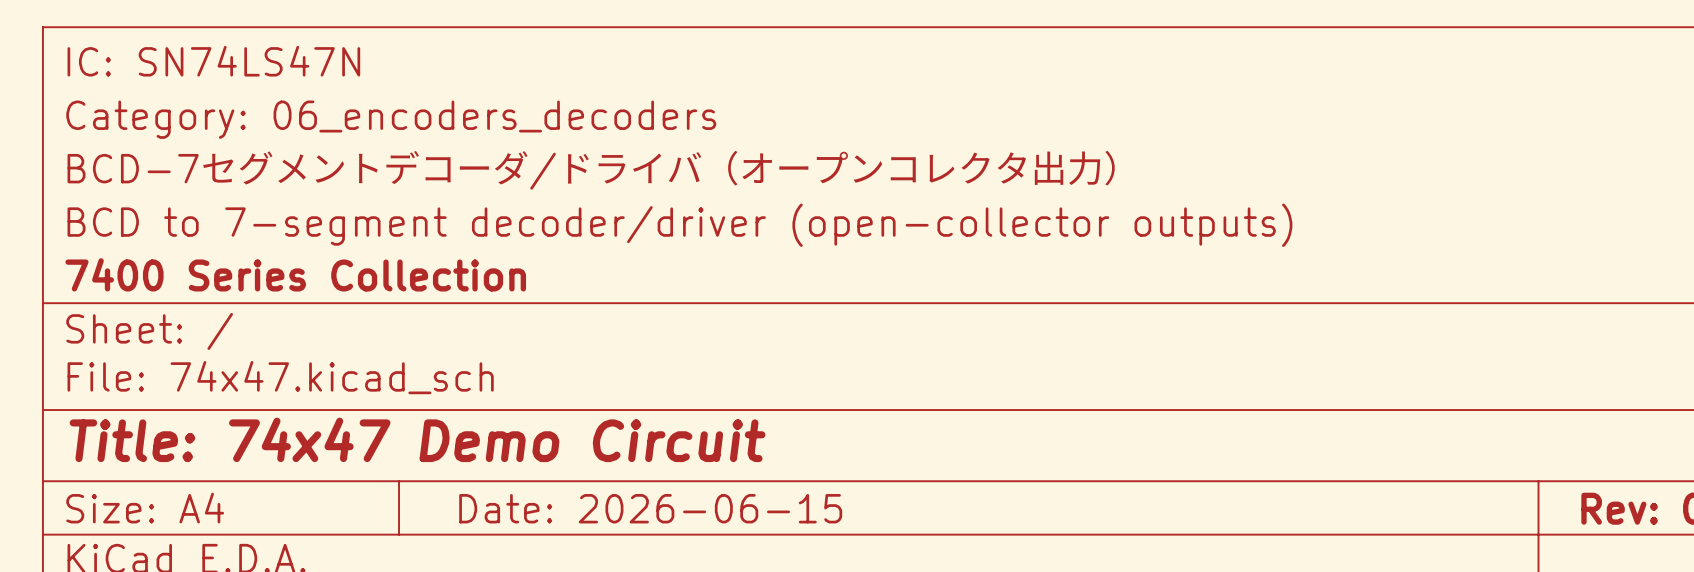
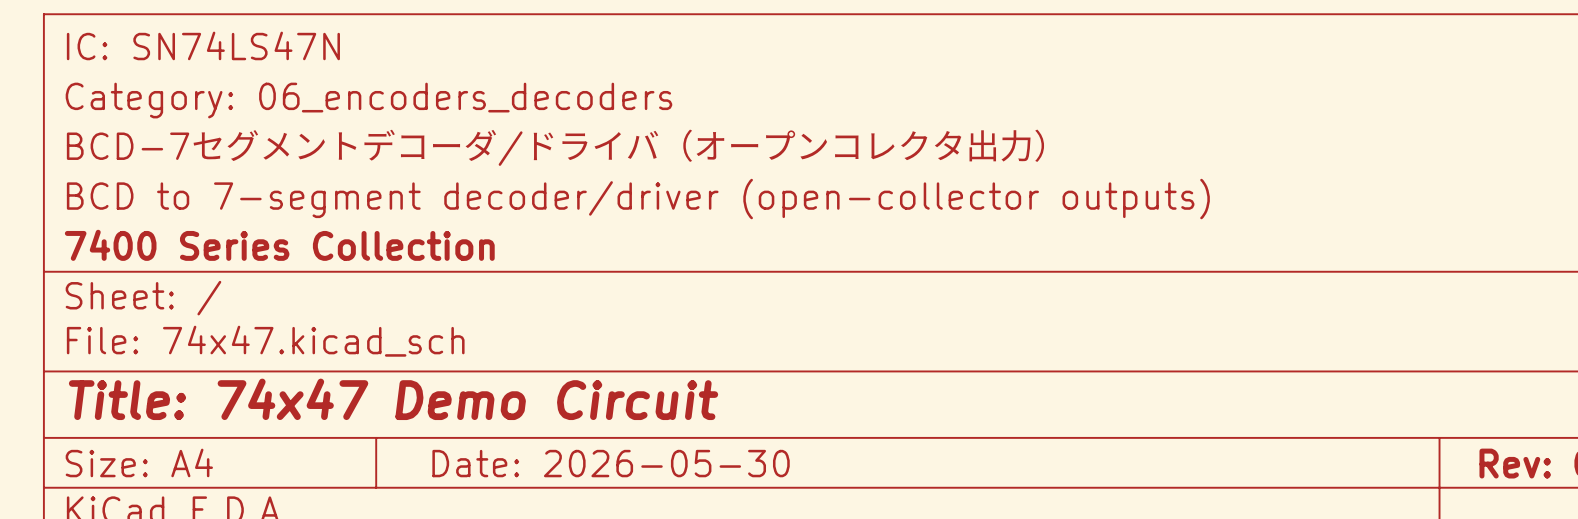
title block: Date: 2026-06-15 (650, 508) -> Date: 2026-05-30 (611, 463)

